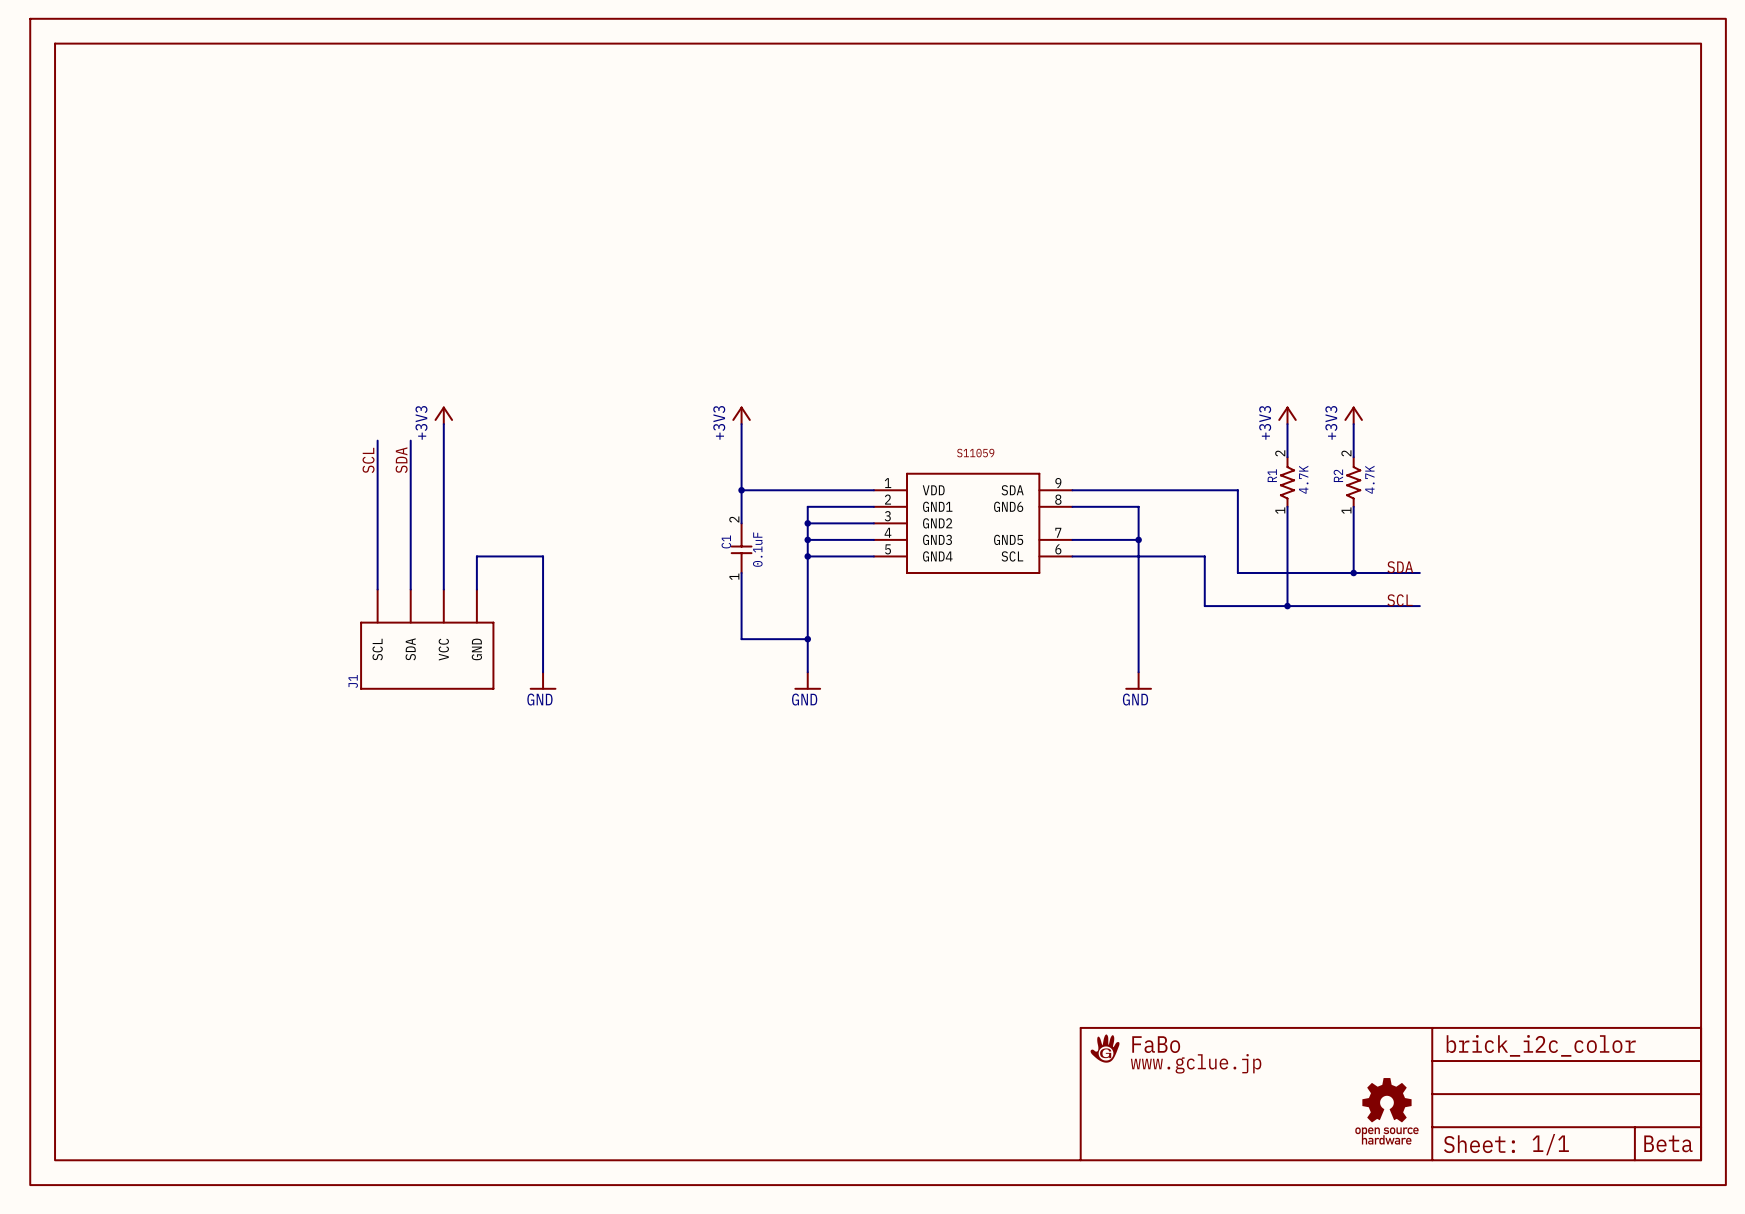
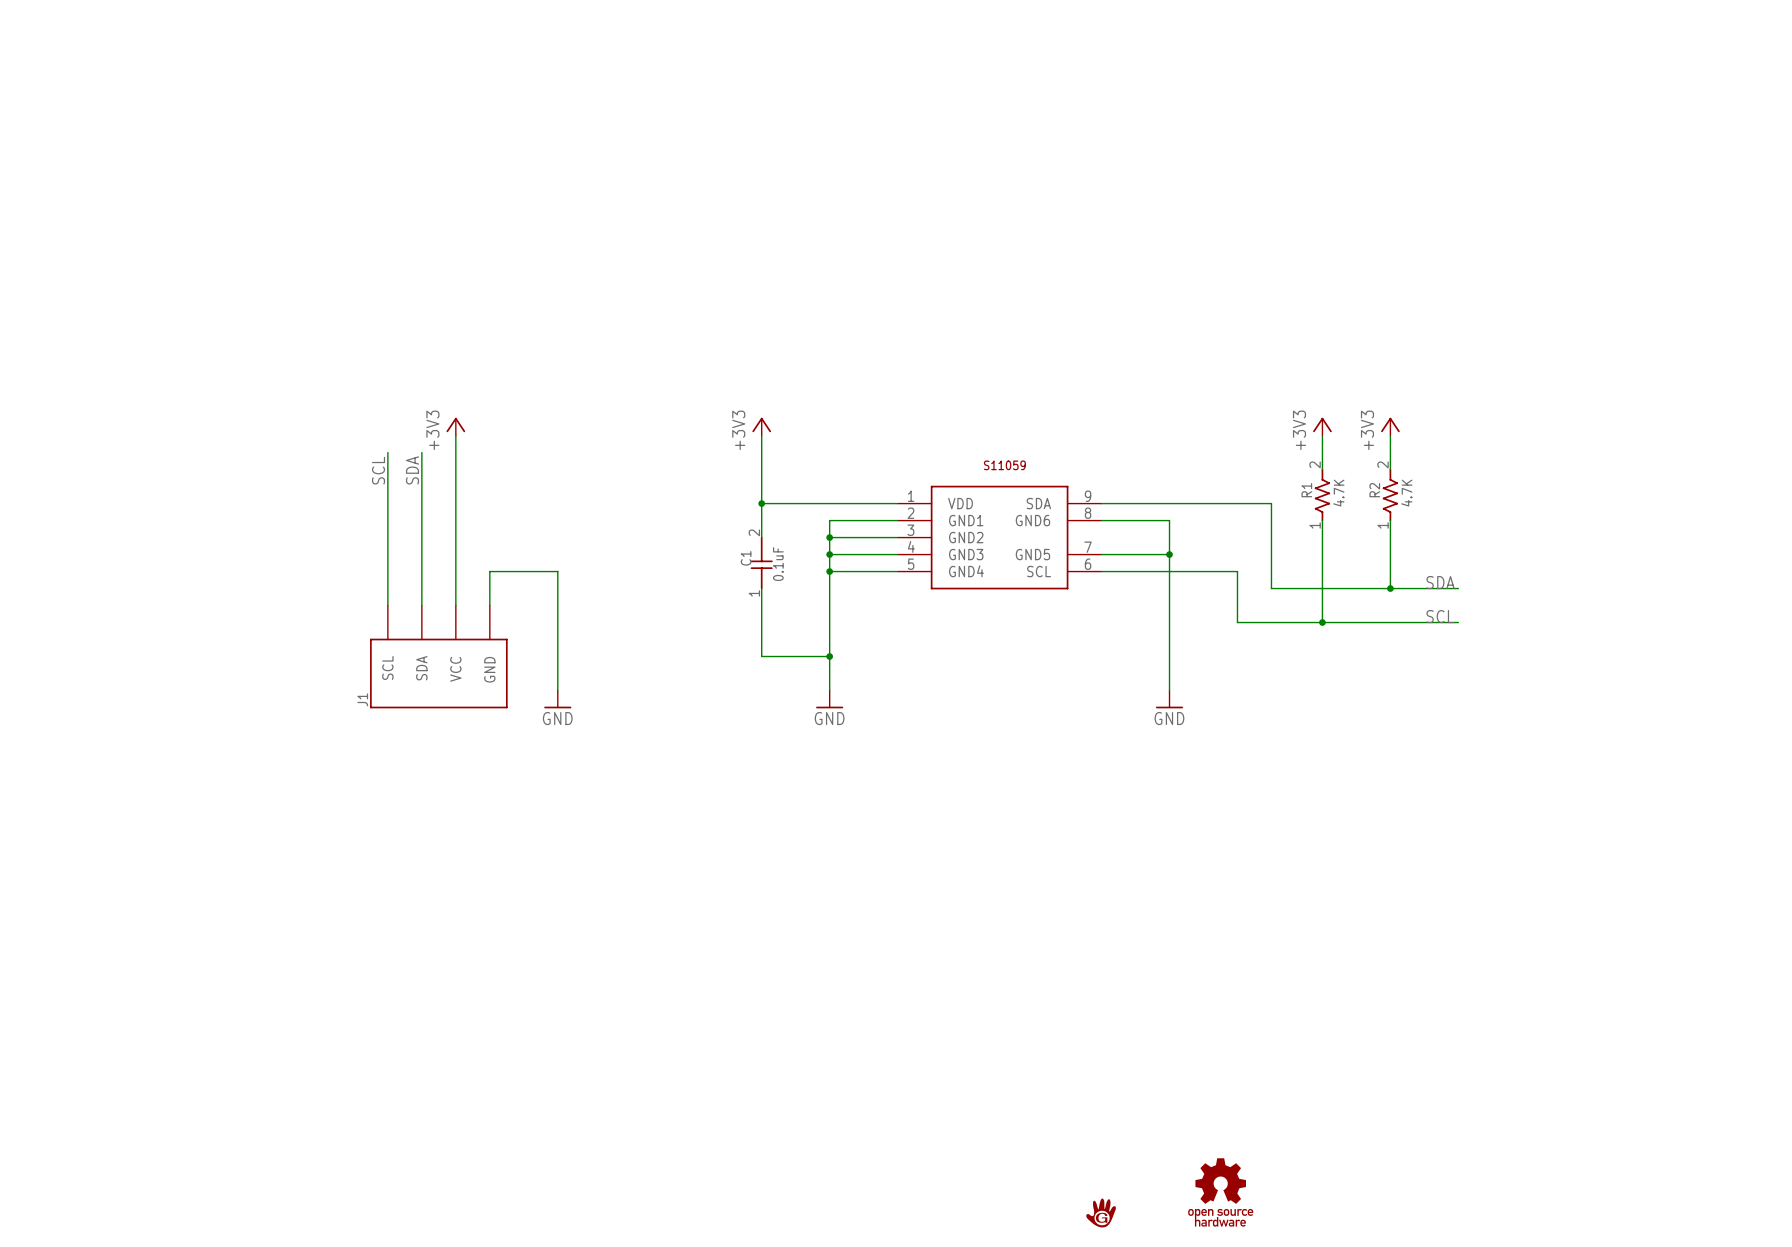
part: (878, 601) -> none
part: (1386, 1111) -> none
text: Beta (1668, 1143) -> none
part: none -> (1220, 1192)
part: none -> (1101, 1212)

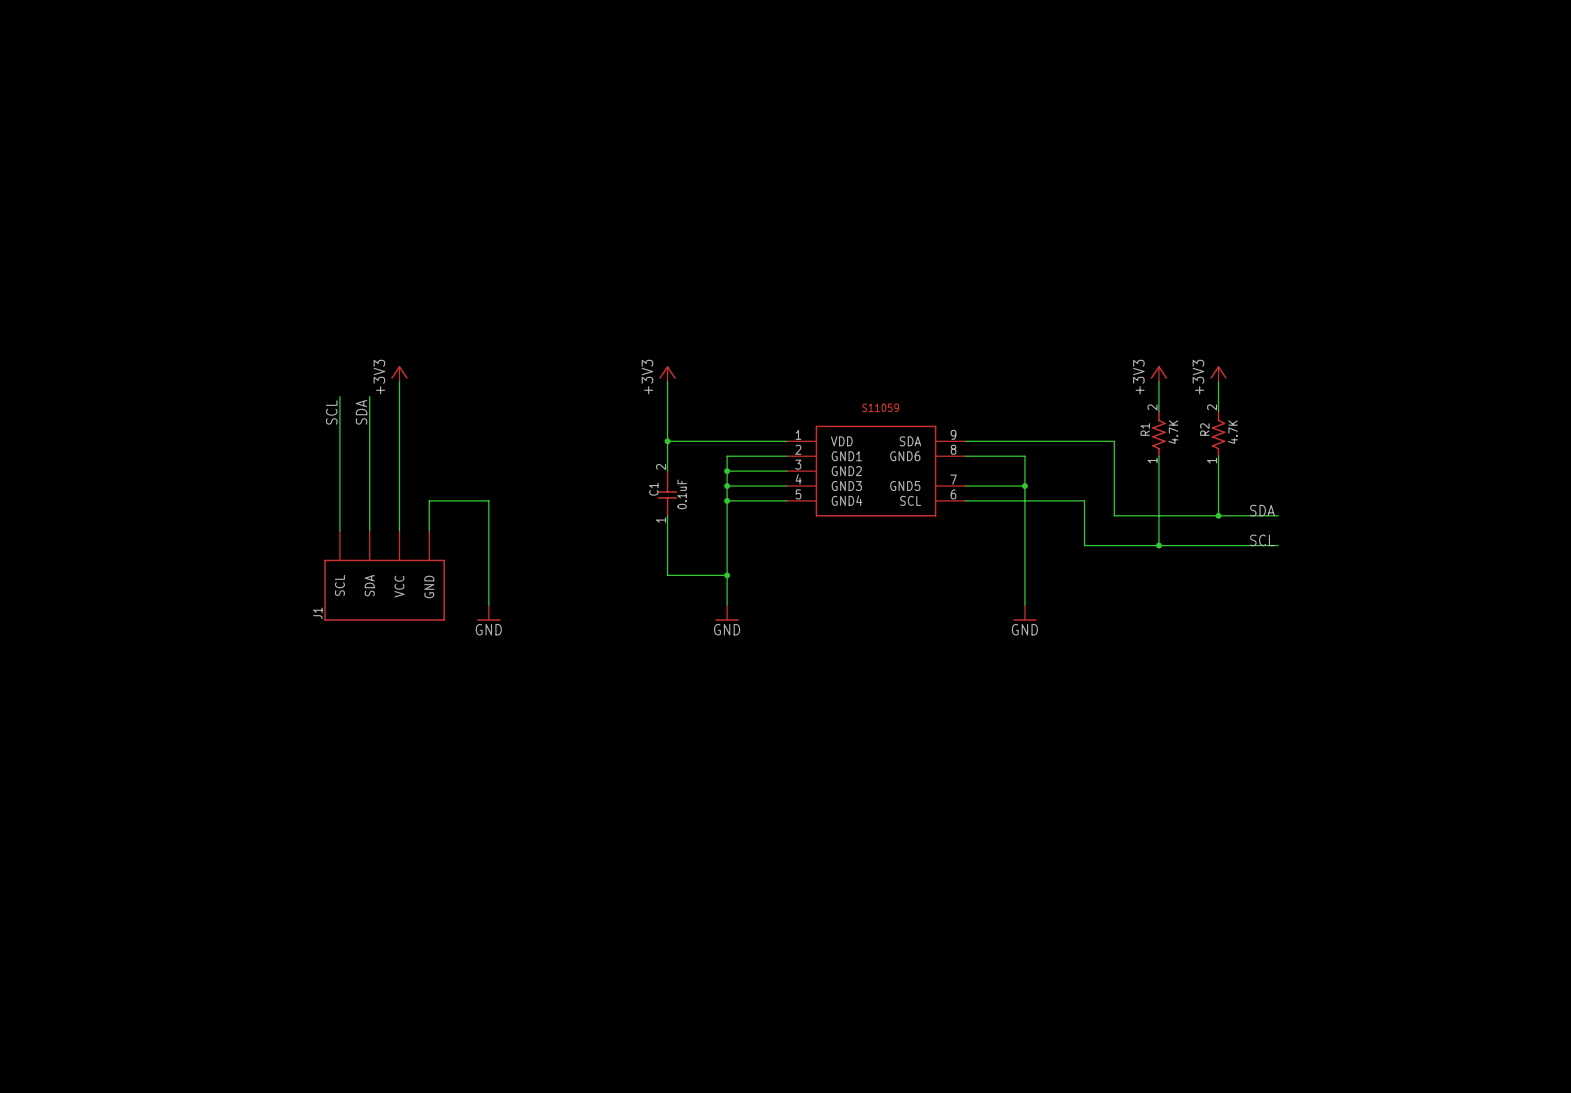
part: (1220, 1192) -> none
part: (1101, 1212) -> none

